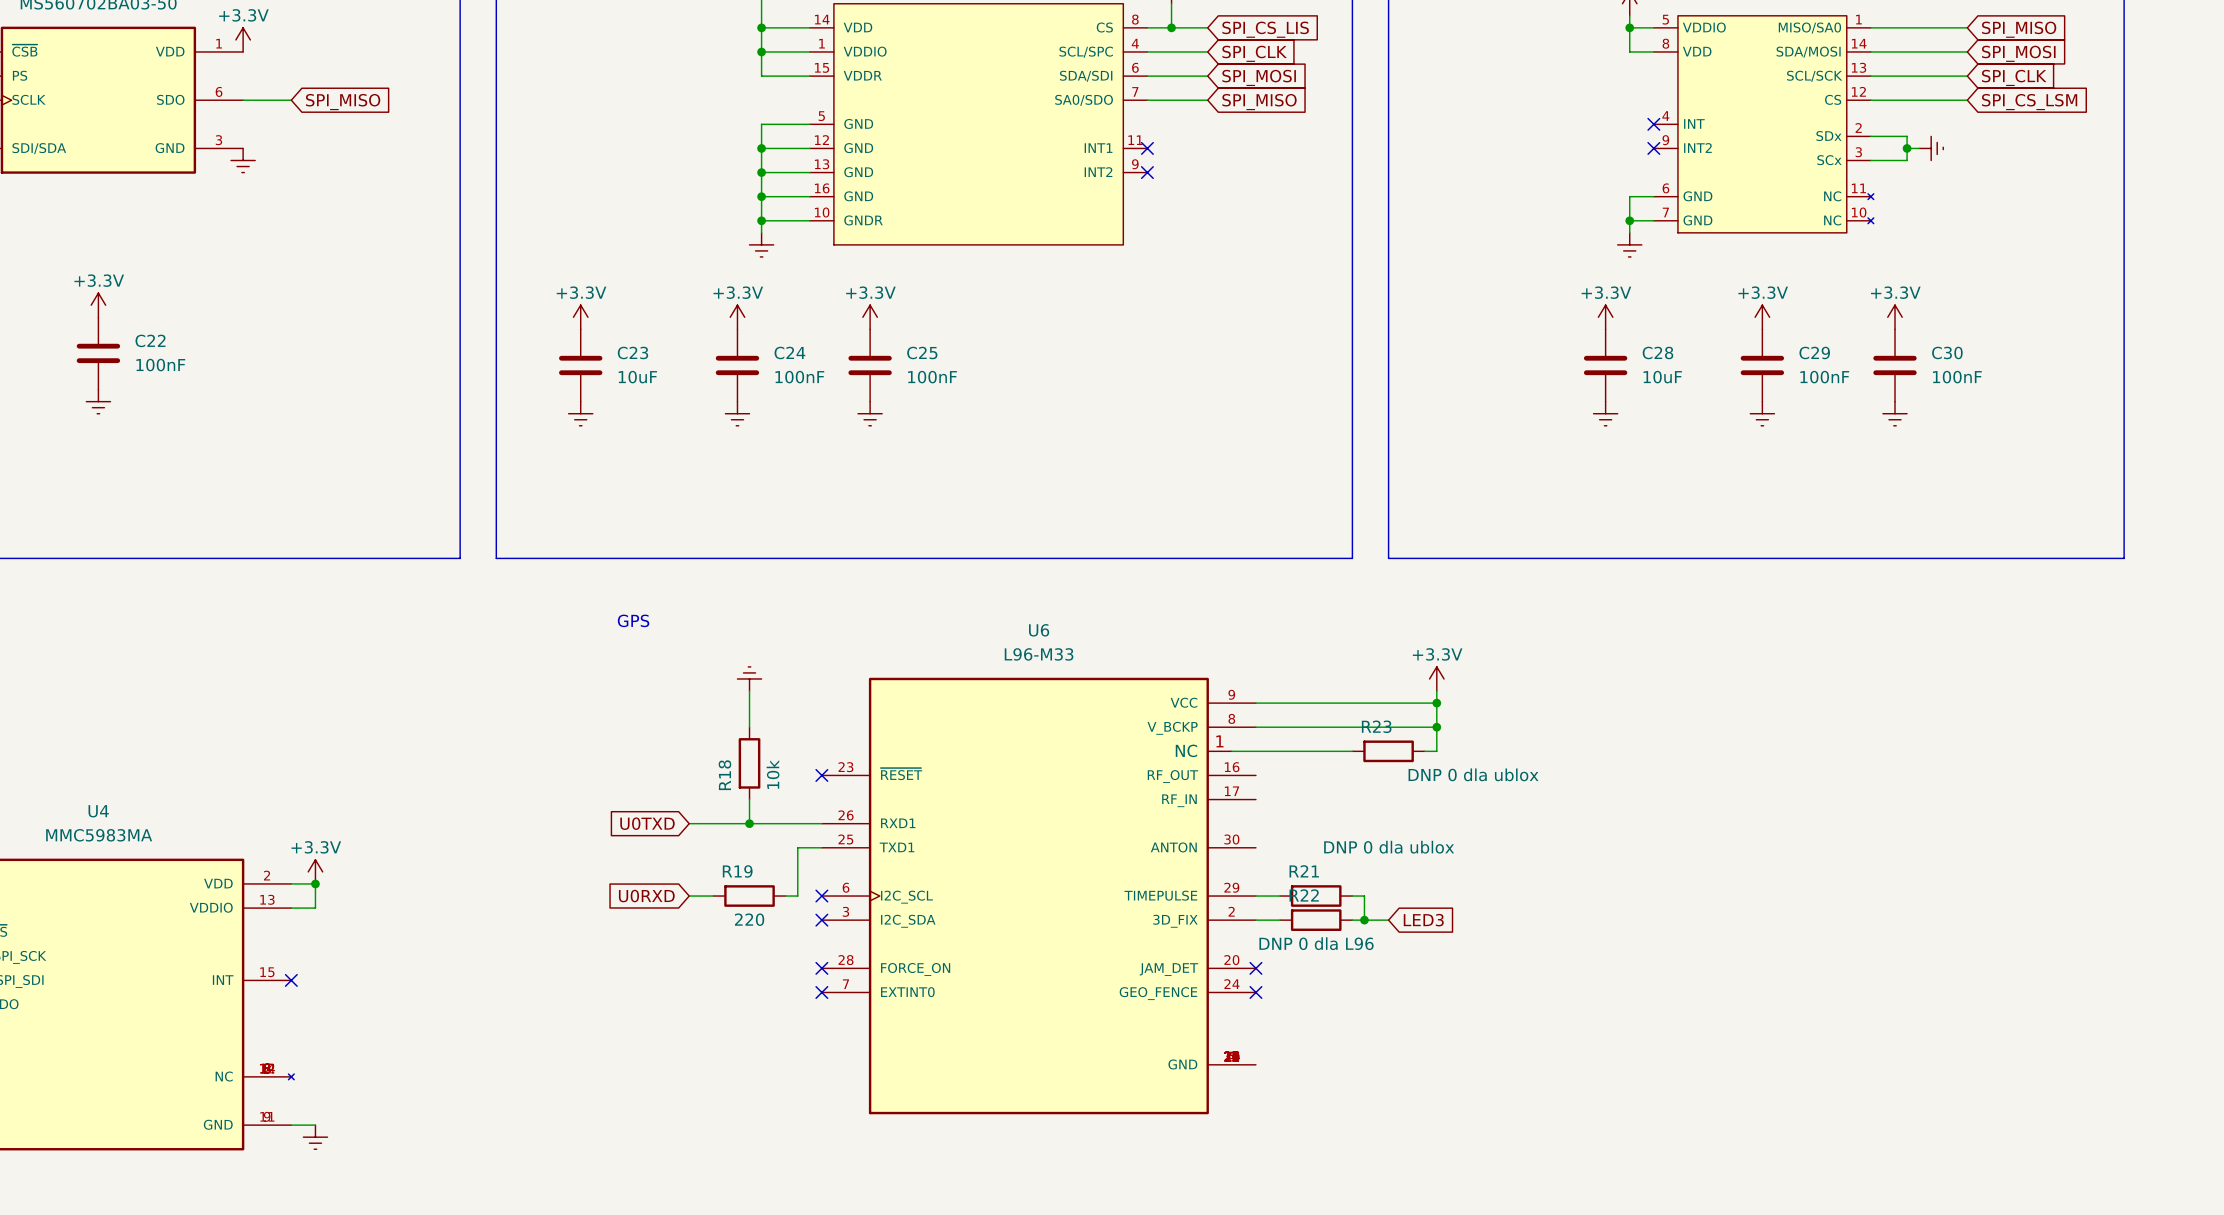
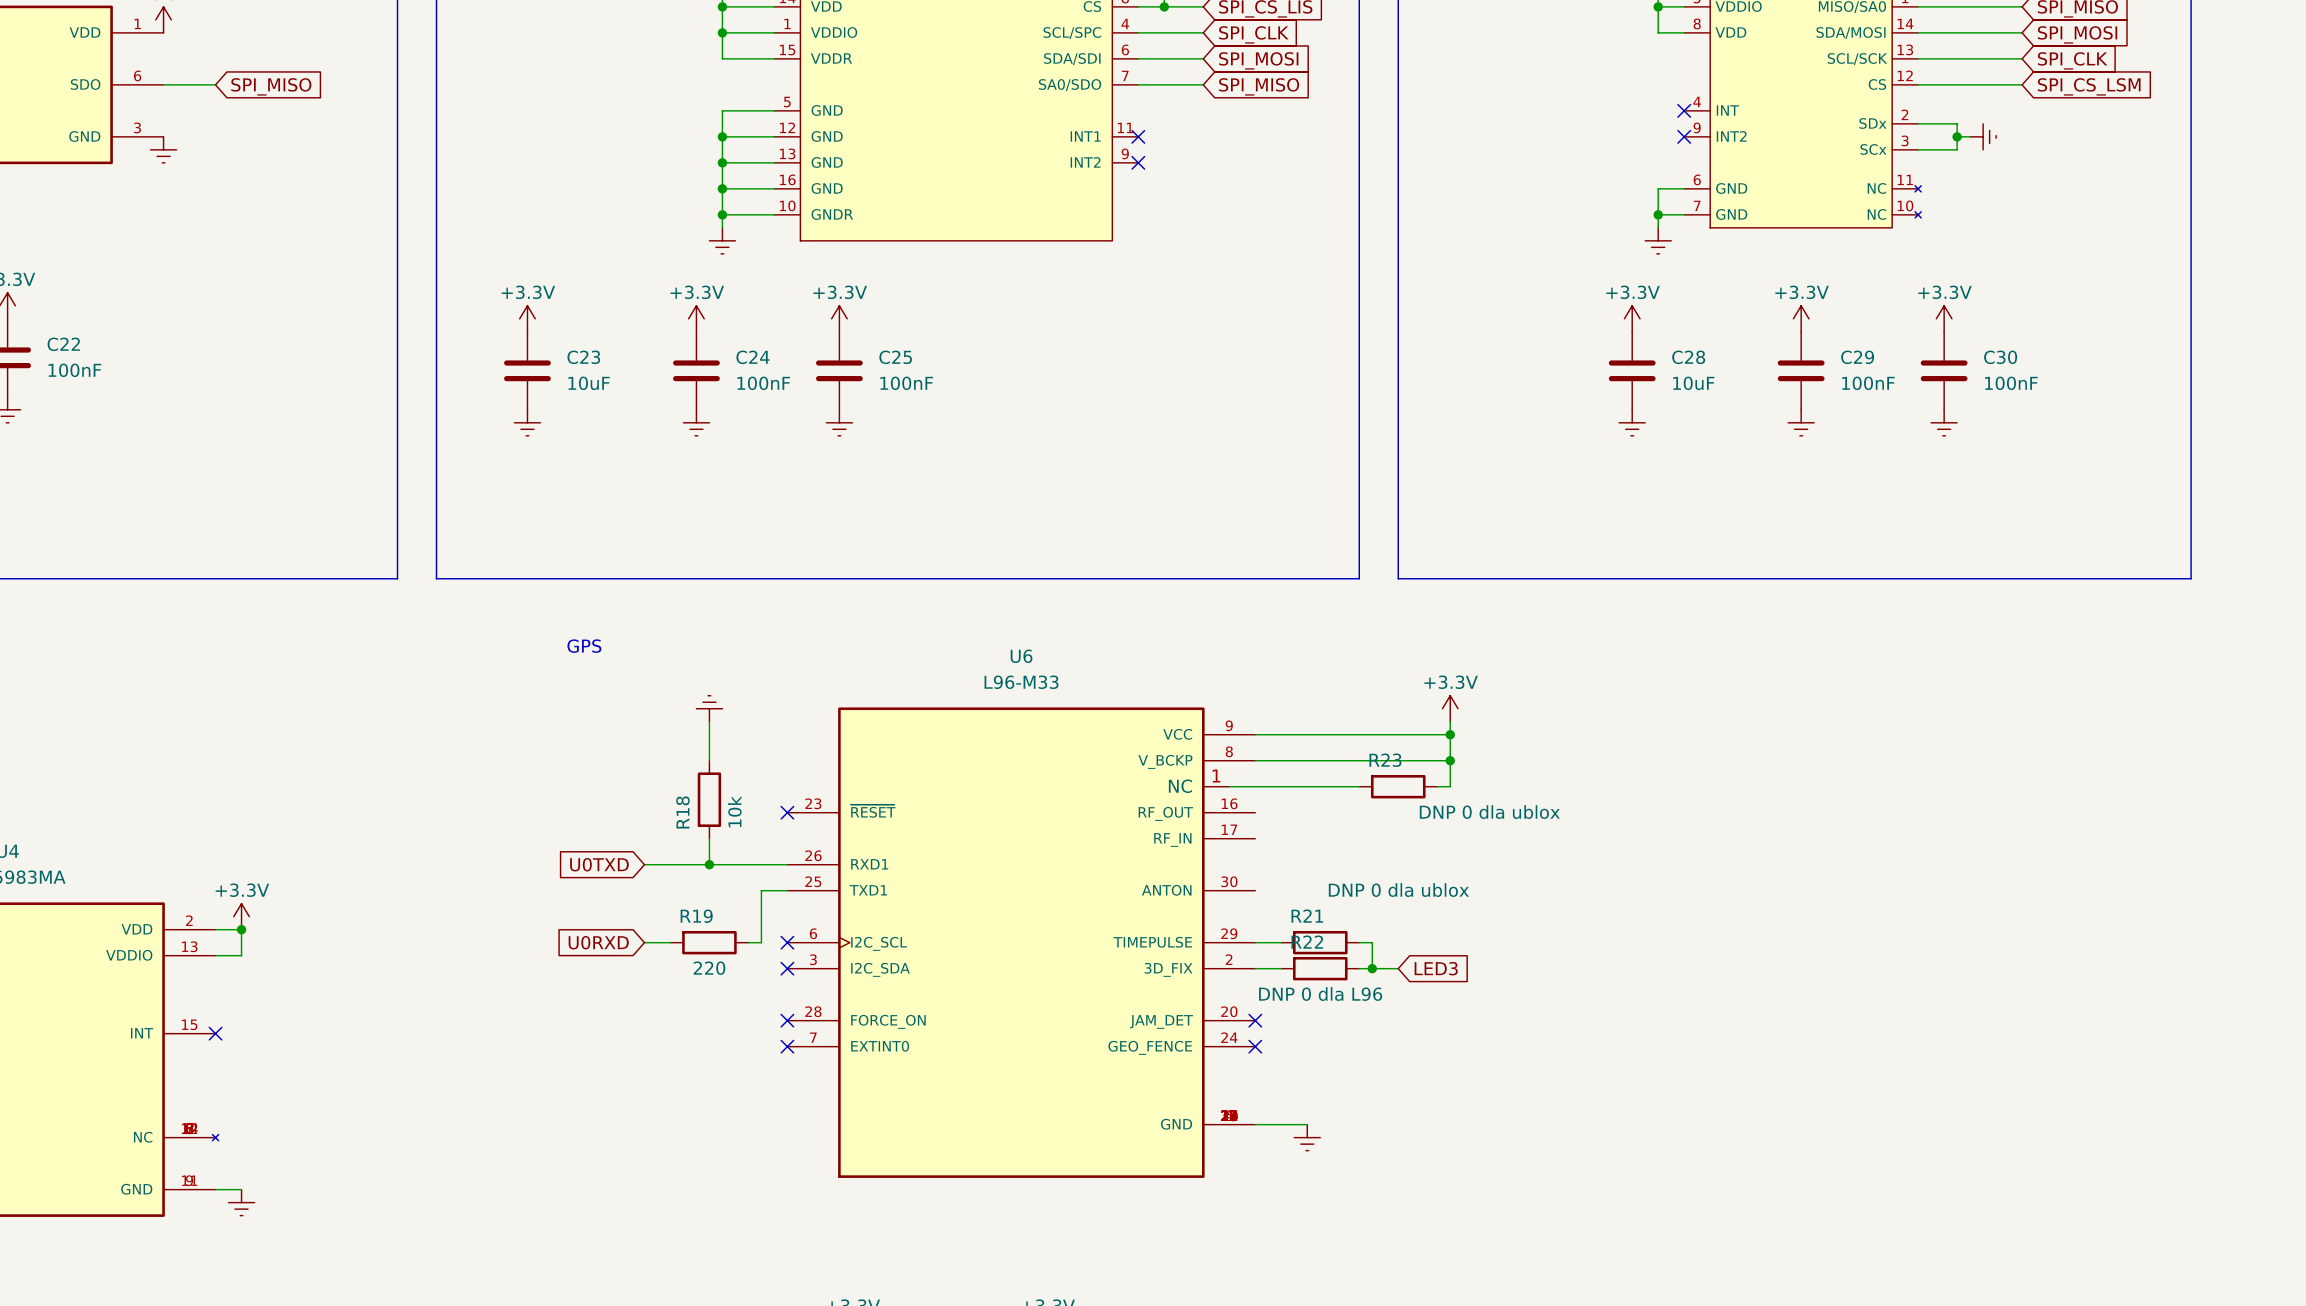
wire: none -> (1255, 1124) (1307, 1124)
power symbol: none -> (1307, 1137)

